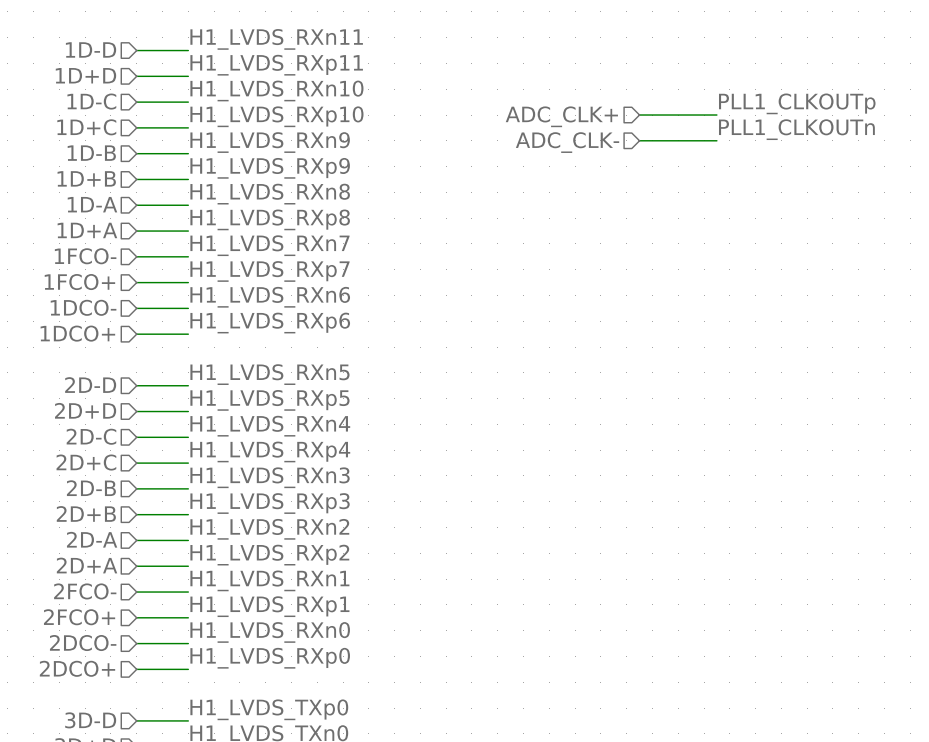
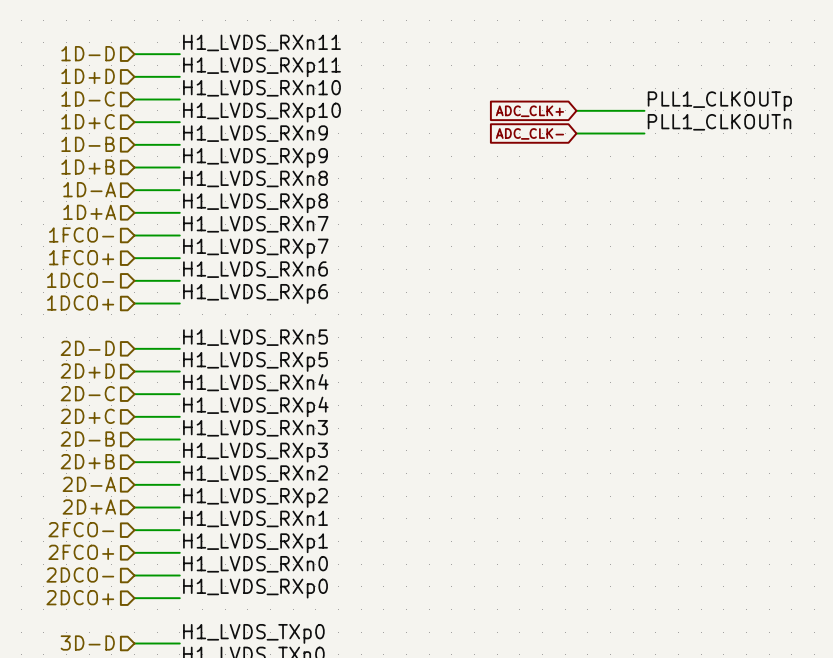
hierarchical label: ADC_CLK+ (561, 116) -> none
global label: none -> ADC_CLK+ (529, 111)
hierarchical label: ADC_CLK- (567, 142) -> none
global label: none -> ADC_CLK- (529, 133)

